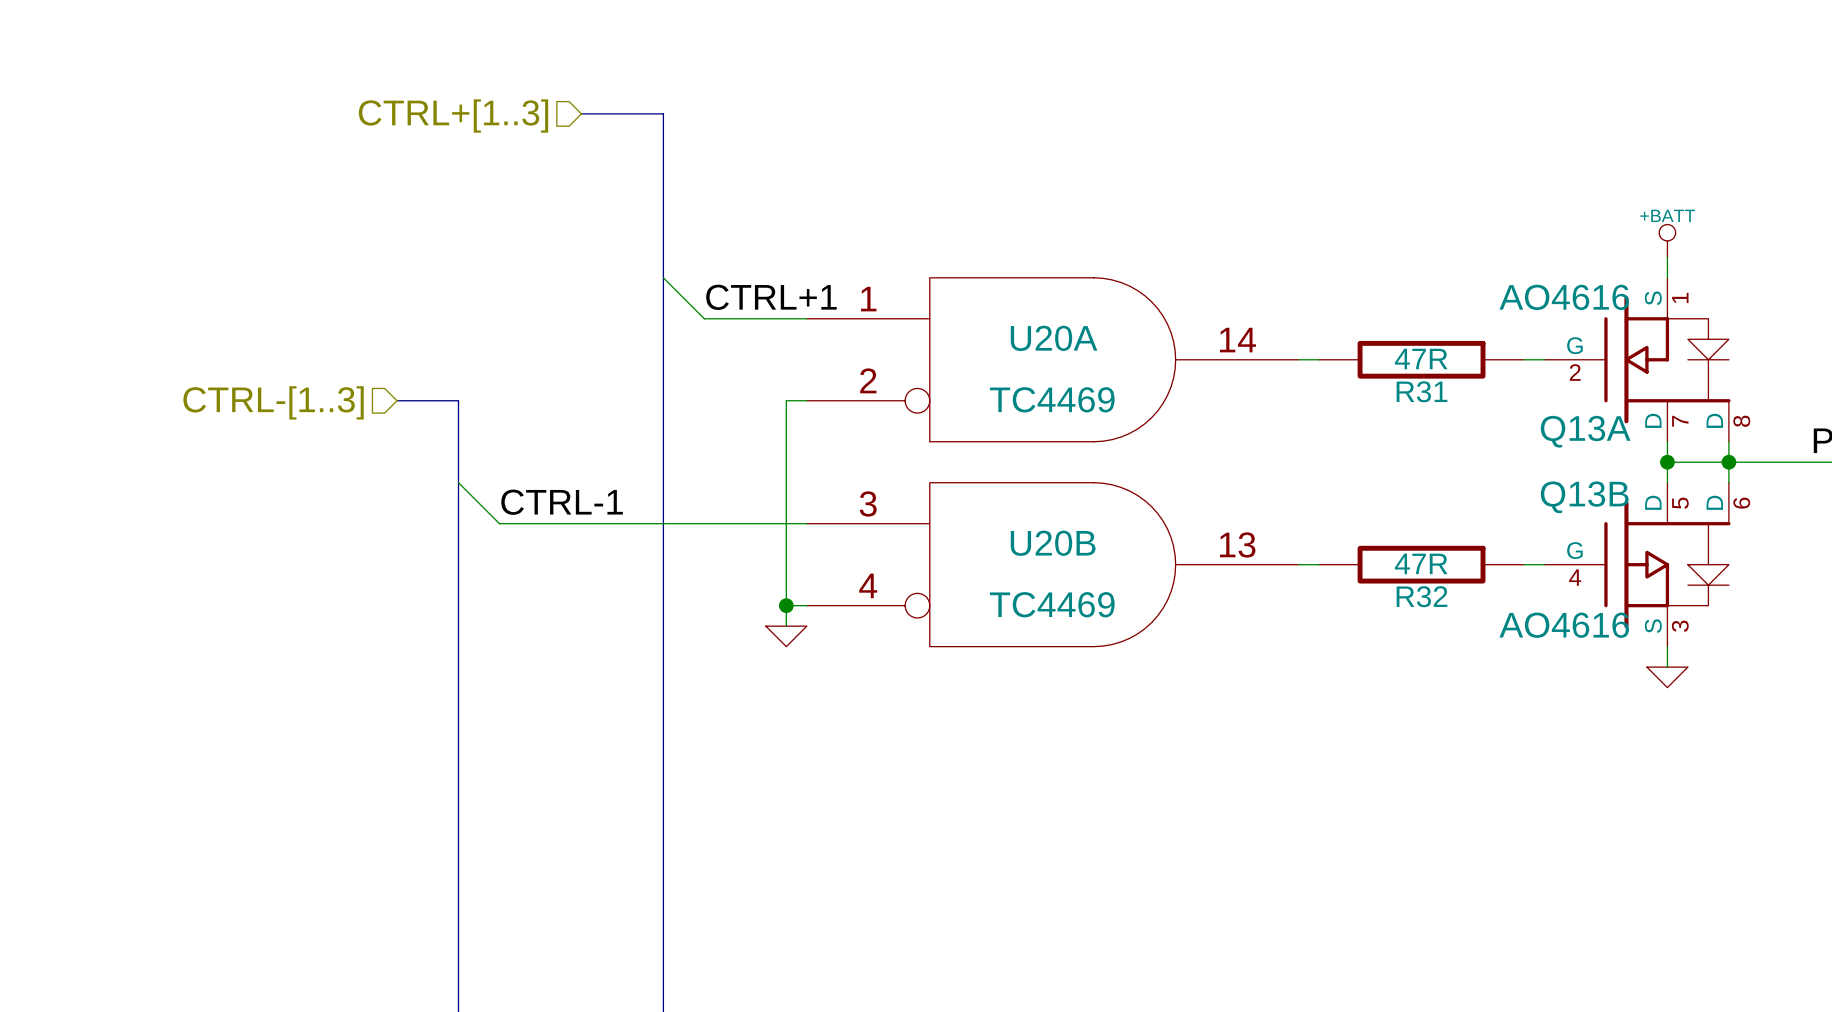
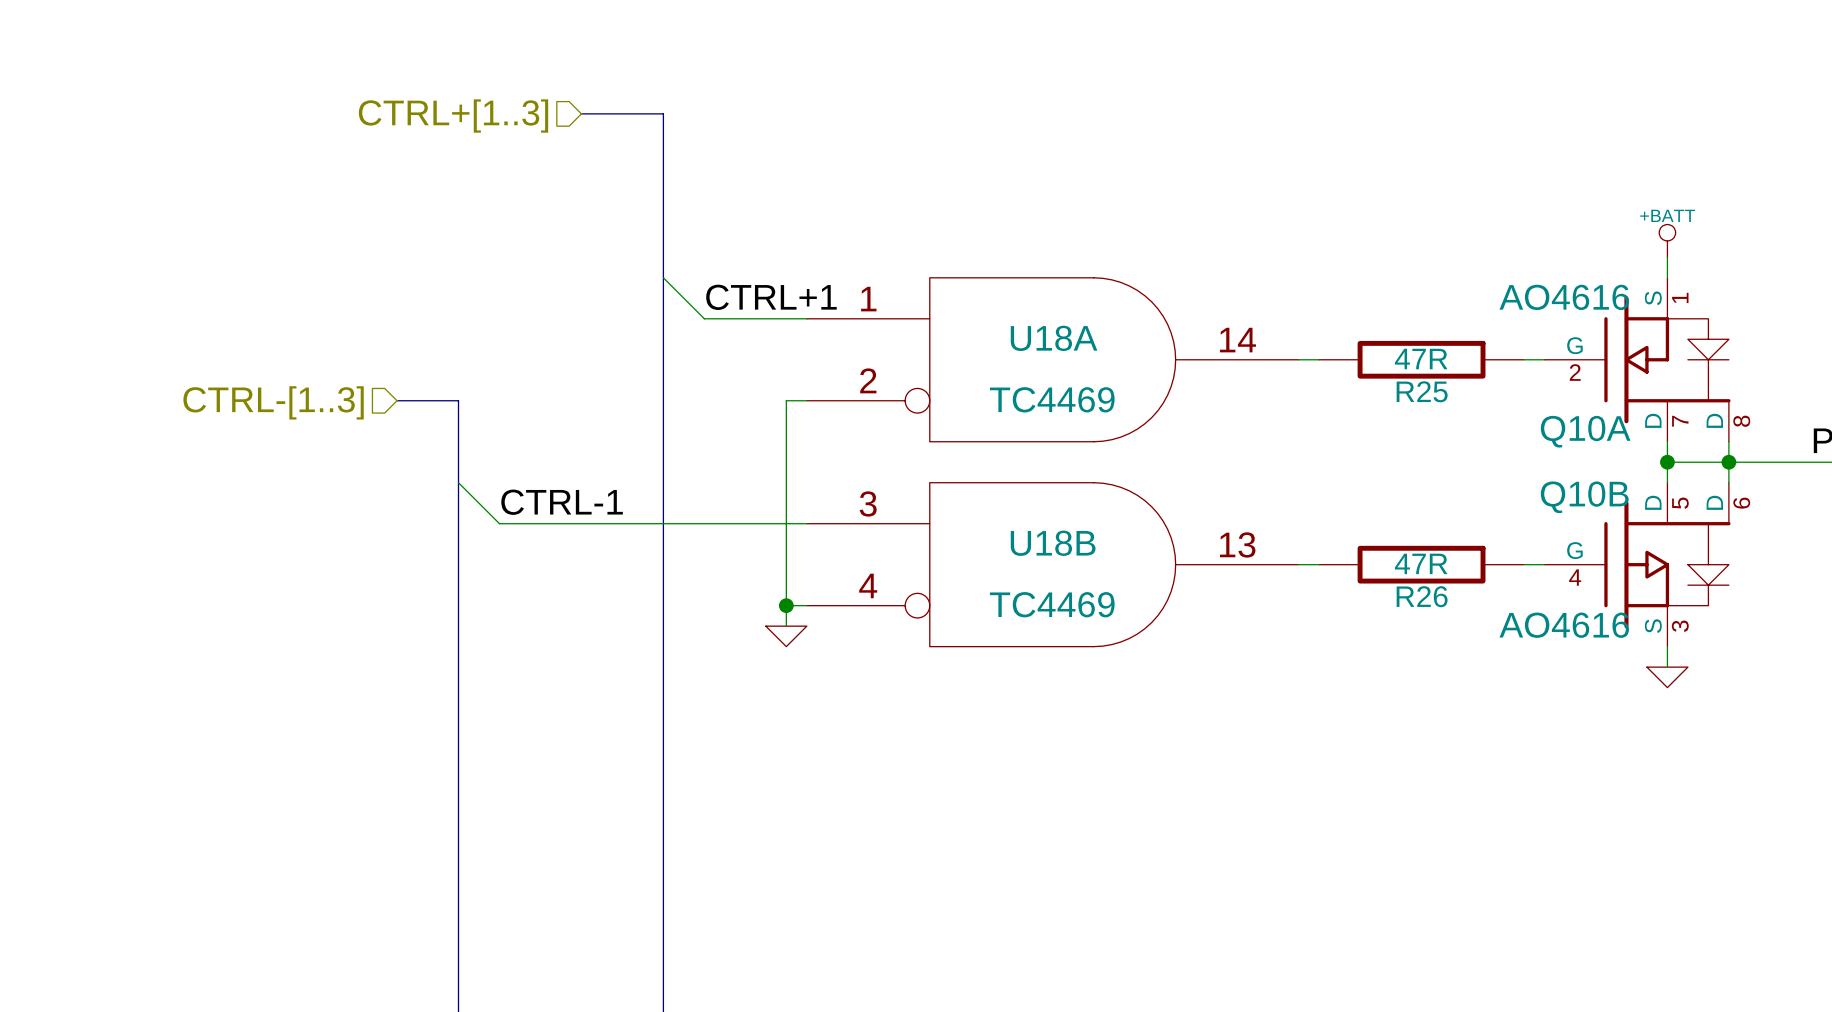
U20A name: U20A (1054, 338) -> U18A (1054, 338)
R31 name: R31 (1422, 391) -> R25 (1422, 391)
Q13A name: Q13A (1585, 431) -> Q10A (1585, 431)
Q13B name: Q13B (1584, 497) -> Q10B (1584, 497)
U20B name: U20B (1053, 543) -> U18B (1053, 543)
R32 name: R32 (1422, 596) -> R26 (1422, 596)

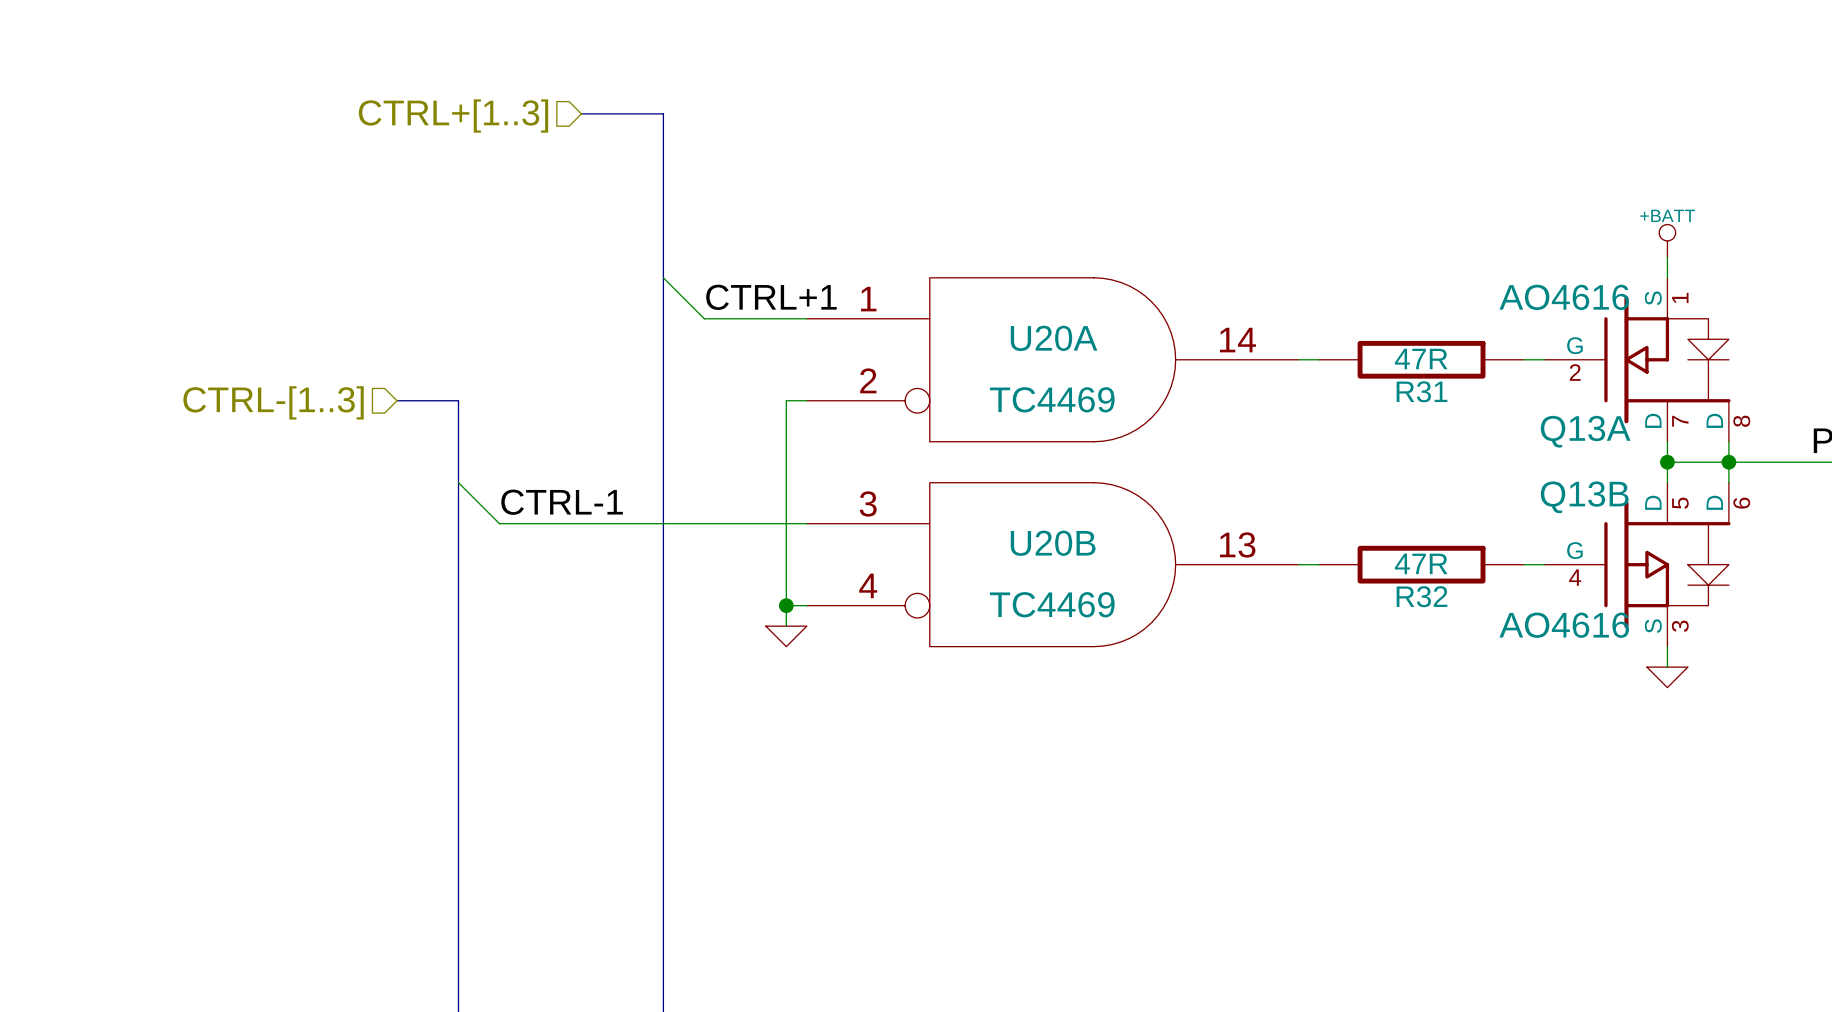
U18A name: U18A (1054, 338) -> U20A (1054, 338)
R25 name: R25 (1422, 391) -> R31 (1422, 391)
Q10A name: Q10A (1585, 431) -> Q13A (1585, 431)
Q10B name: Q10B (1584, 497) -> Q13B (1584, 497)
U18B name: U18B (1053, 543) -> U20B (1053, 543)
R26 name: R26 (1422, 596) -> R32 (1422, 596)

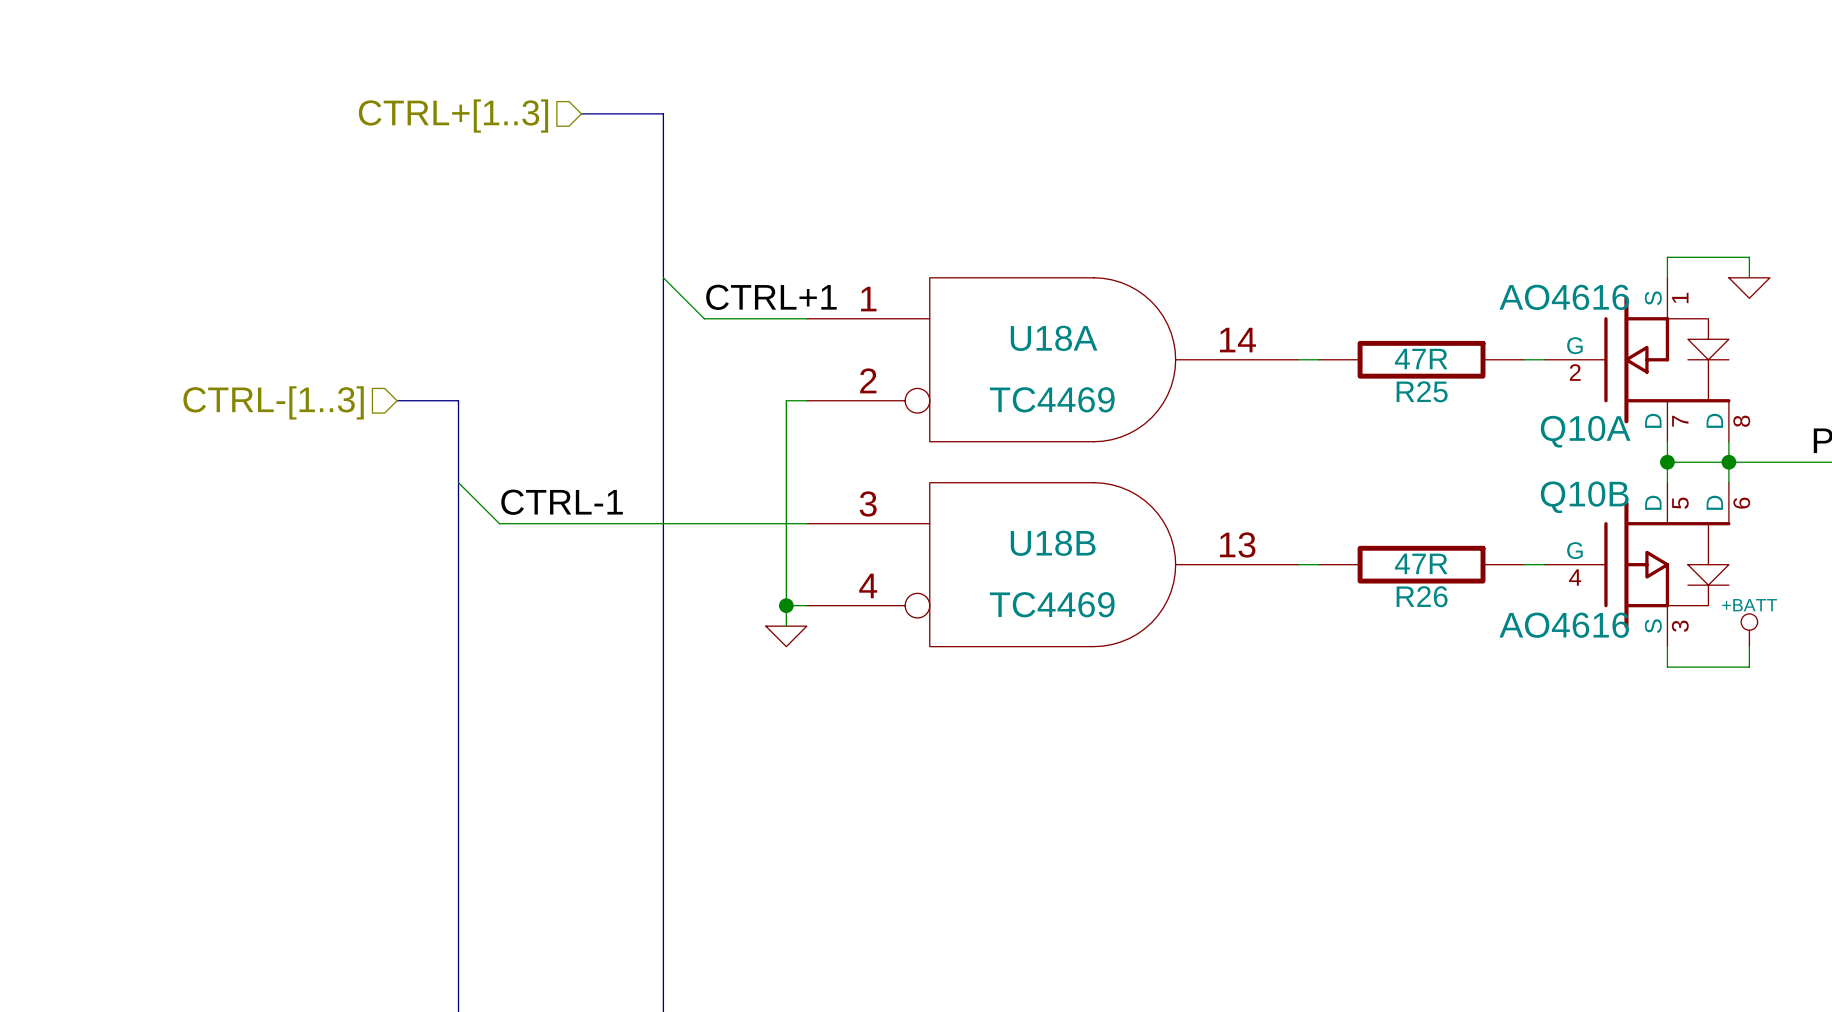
power symbol: +BATT (1667, 240) -> none
wire: none -> (1667, 257) (1749, 257) (1749, 277)
U20A name: U20A (1054, 338) -> U18A (1054, 338)
R31 name: R31 (1422, 391) -> R25 (1422, 391)
Q13A name: Q13A (1585, 431) -> Q10A (1585, 431)
Q13B name: Q13B (1584, 497) -> Q10B (1584, 497)
U20B name: U20B (1053, 543) -> U18B (1053, 543)
R32 name: R32 (1422, 596) -> R26 (1422, 596)
power symbol: none -> +BATT (1749, 630)
wire: none -> (1749, 646) (1749, 667) (1667, 667)
power symbol position: (1667, 677) -> (1749, 288)

